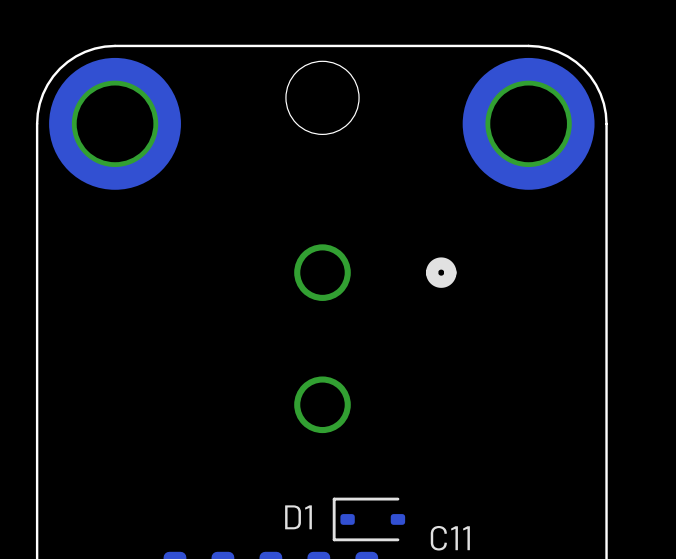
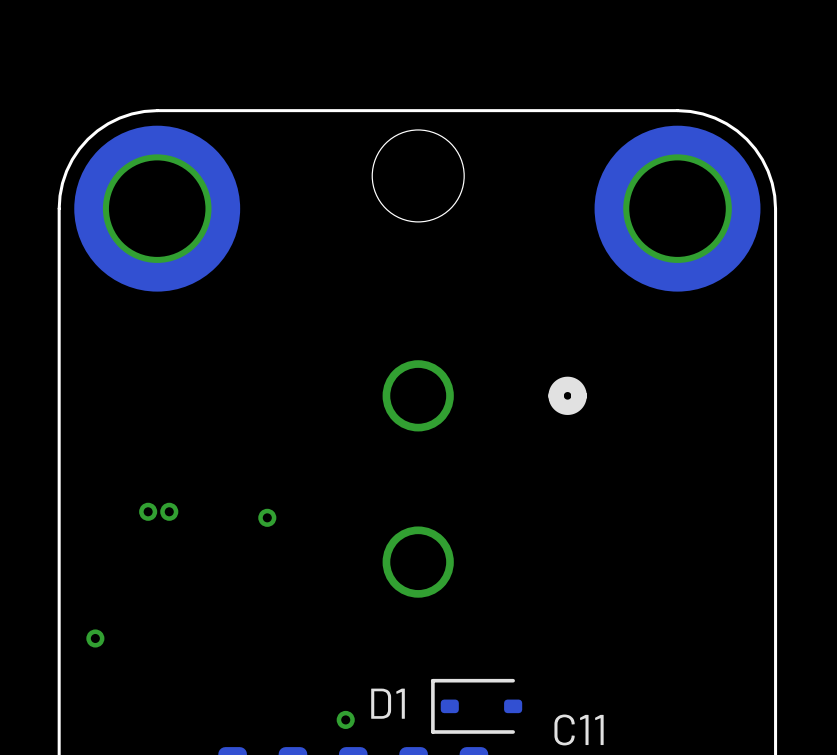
via: none -> (148, 511)
via: none -> (169, 511)
via: none -> (267, 517)
via: none -> (95, 638)
via: none -> (345, 719)

